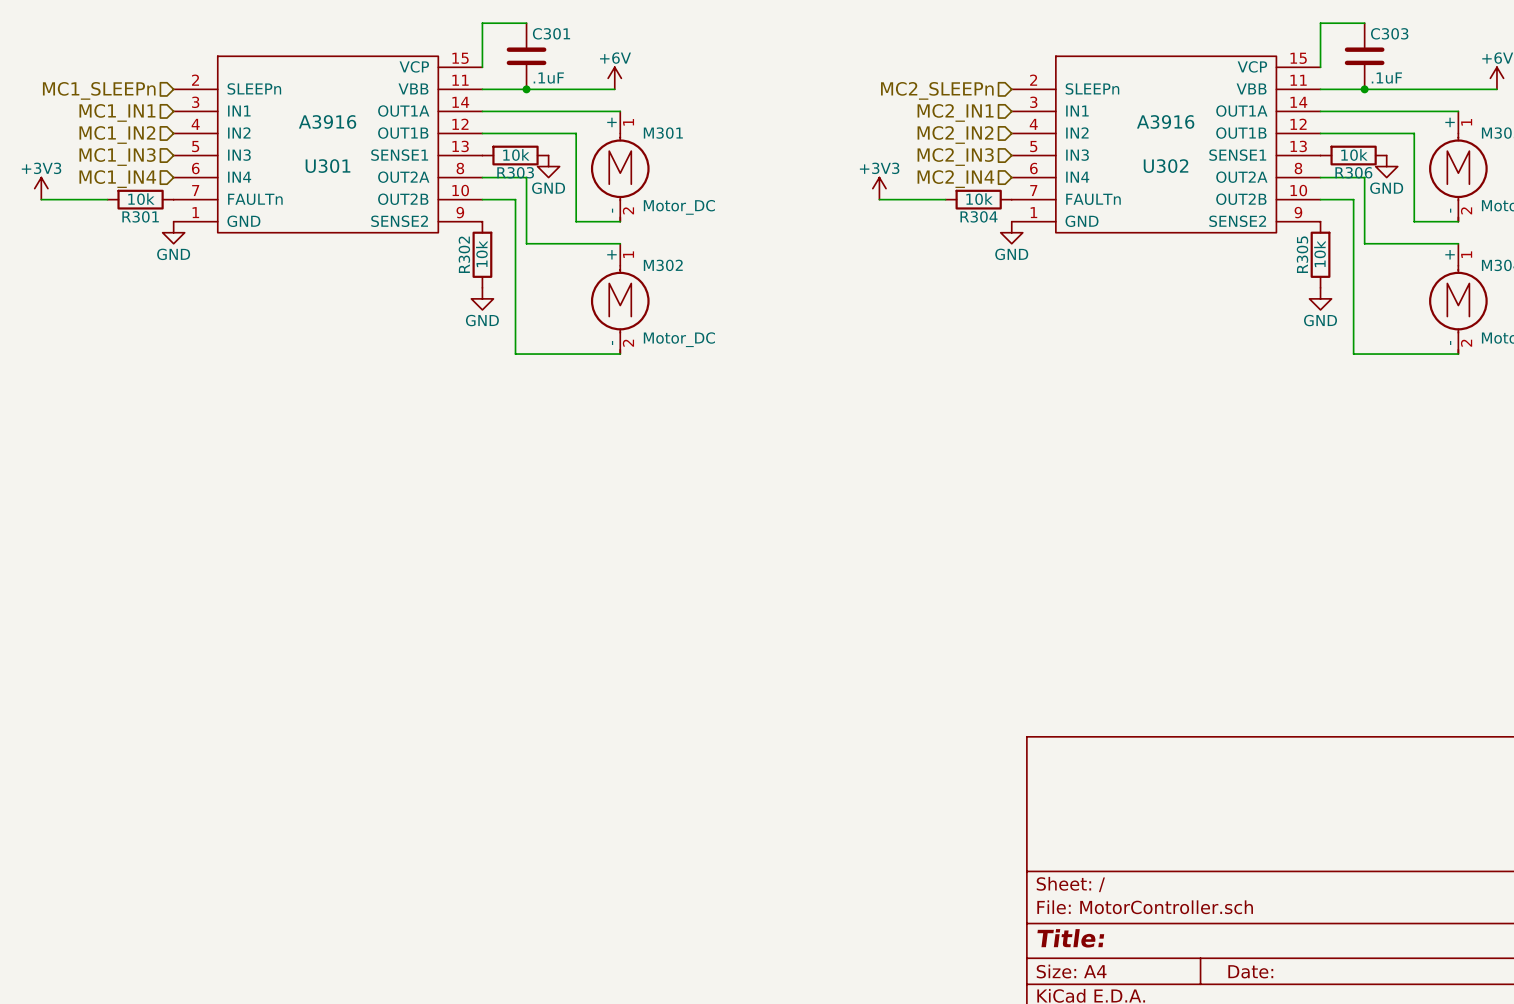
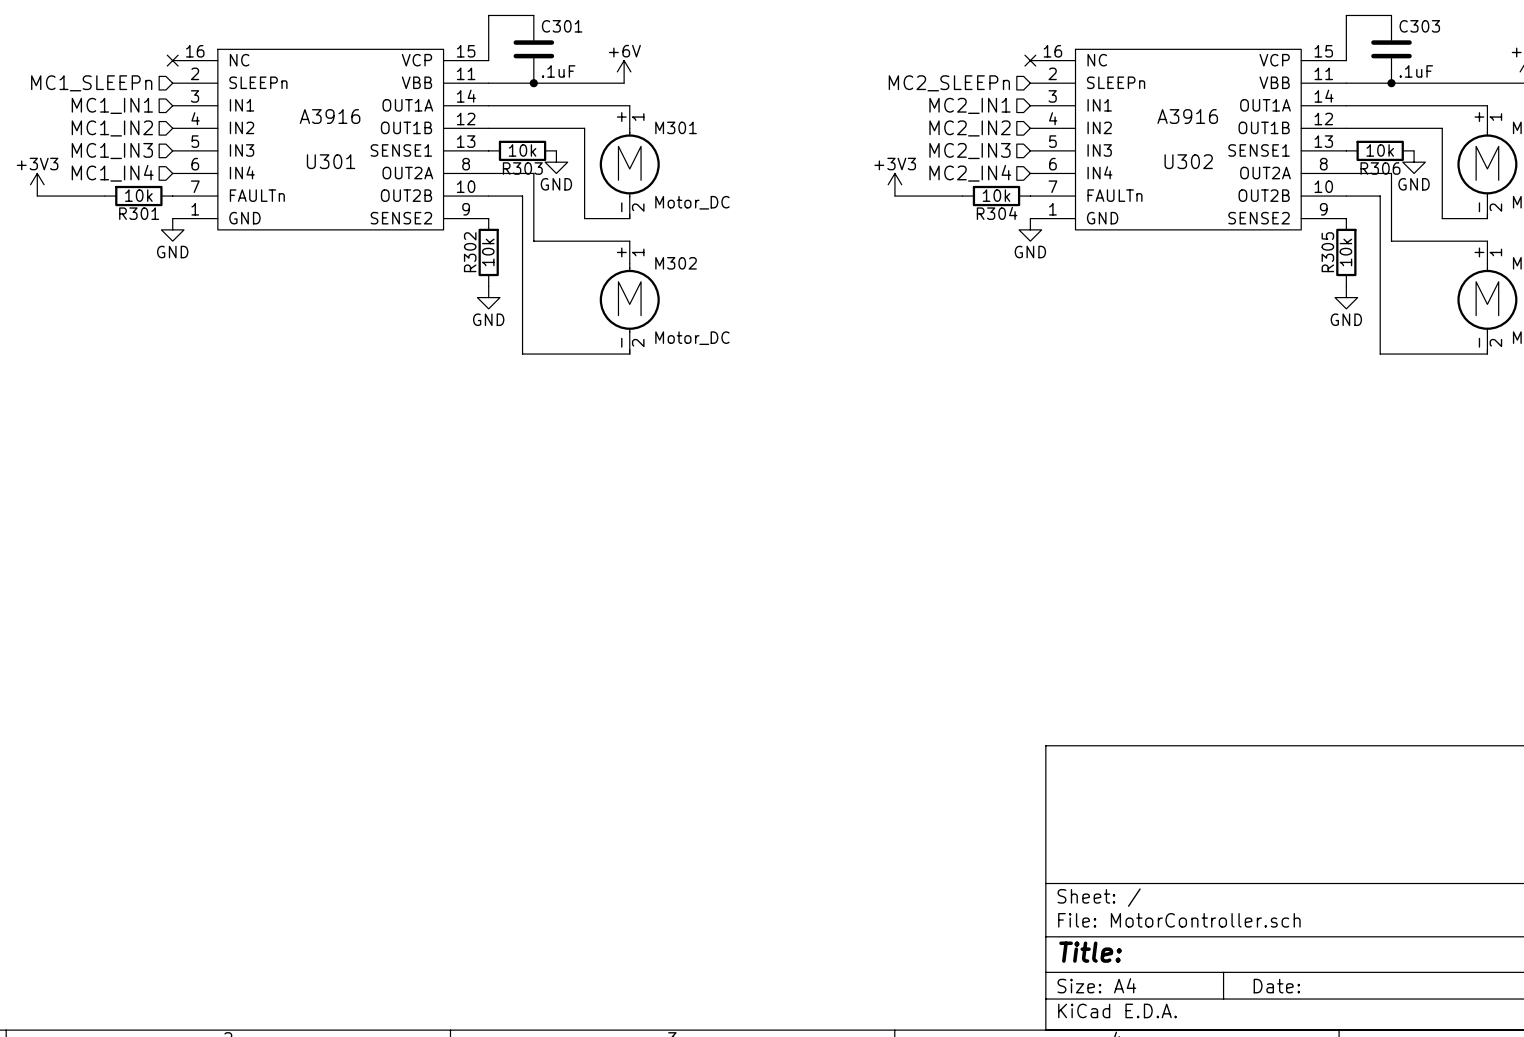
U301 symbol: [173, 56, 483, 233] -> [172, 49, 489, 230]
U302 symbol: [1011, 56, 1321, 233] -> [1030, 49, 1347, 230]
no-connect mark: none -> (172, 60)
no-connect mark: none -> (1030, 60)

